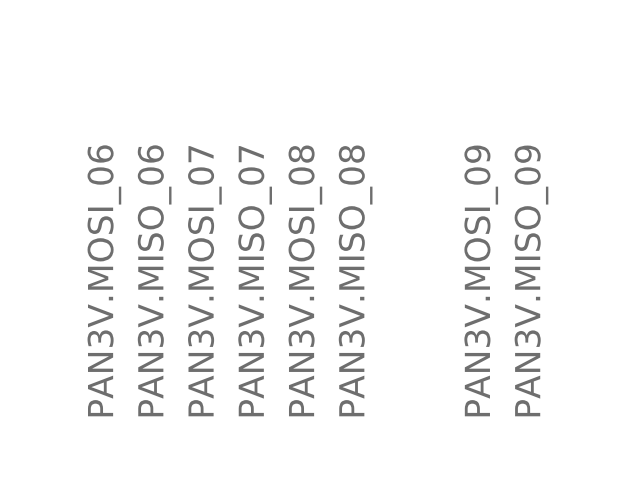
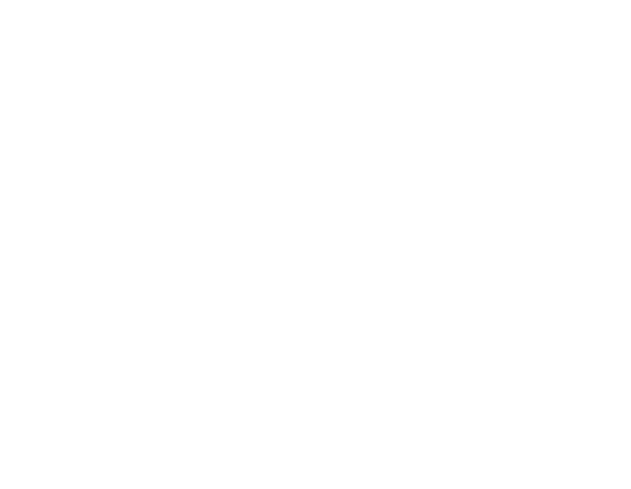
label: PAN3V.MOSI_06 (104, 280) -> none
label: PAN3V.MISO_06 (154, 280) -> none
label: PAN3V.MOSI_08 (305, 280) -> none
label: PAN3V.MISO_08 (355, 280) -> none
label: PAN3V.MOSI_09 (481, 280) -> none
label: PAN3V.MISO_09 (531, 280) -> none
label: PAN3V.MOSI_07 (204, 281) -> none
label: PAN3V.MISO_07 (255, 281) -> none

